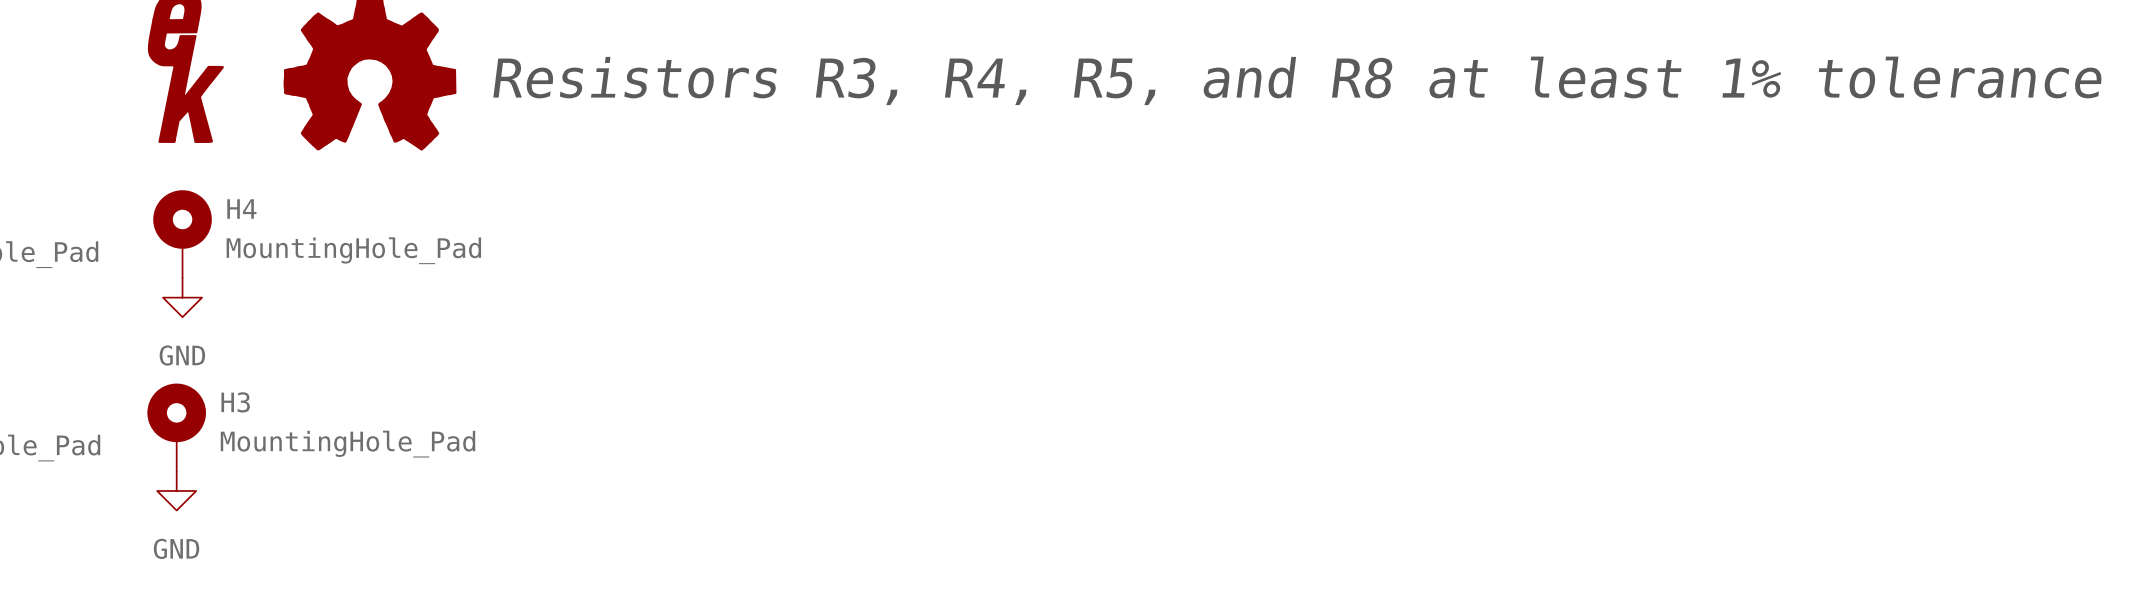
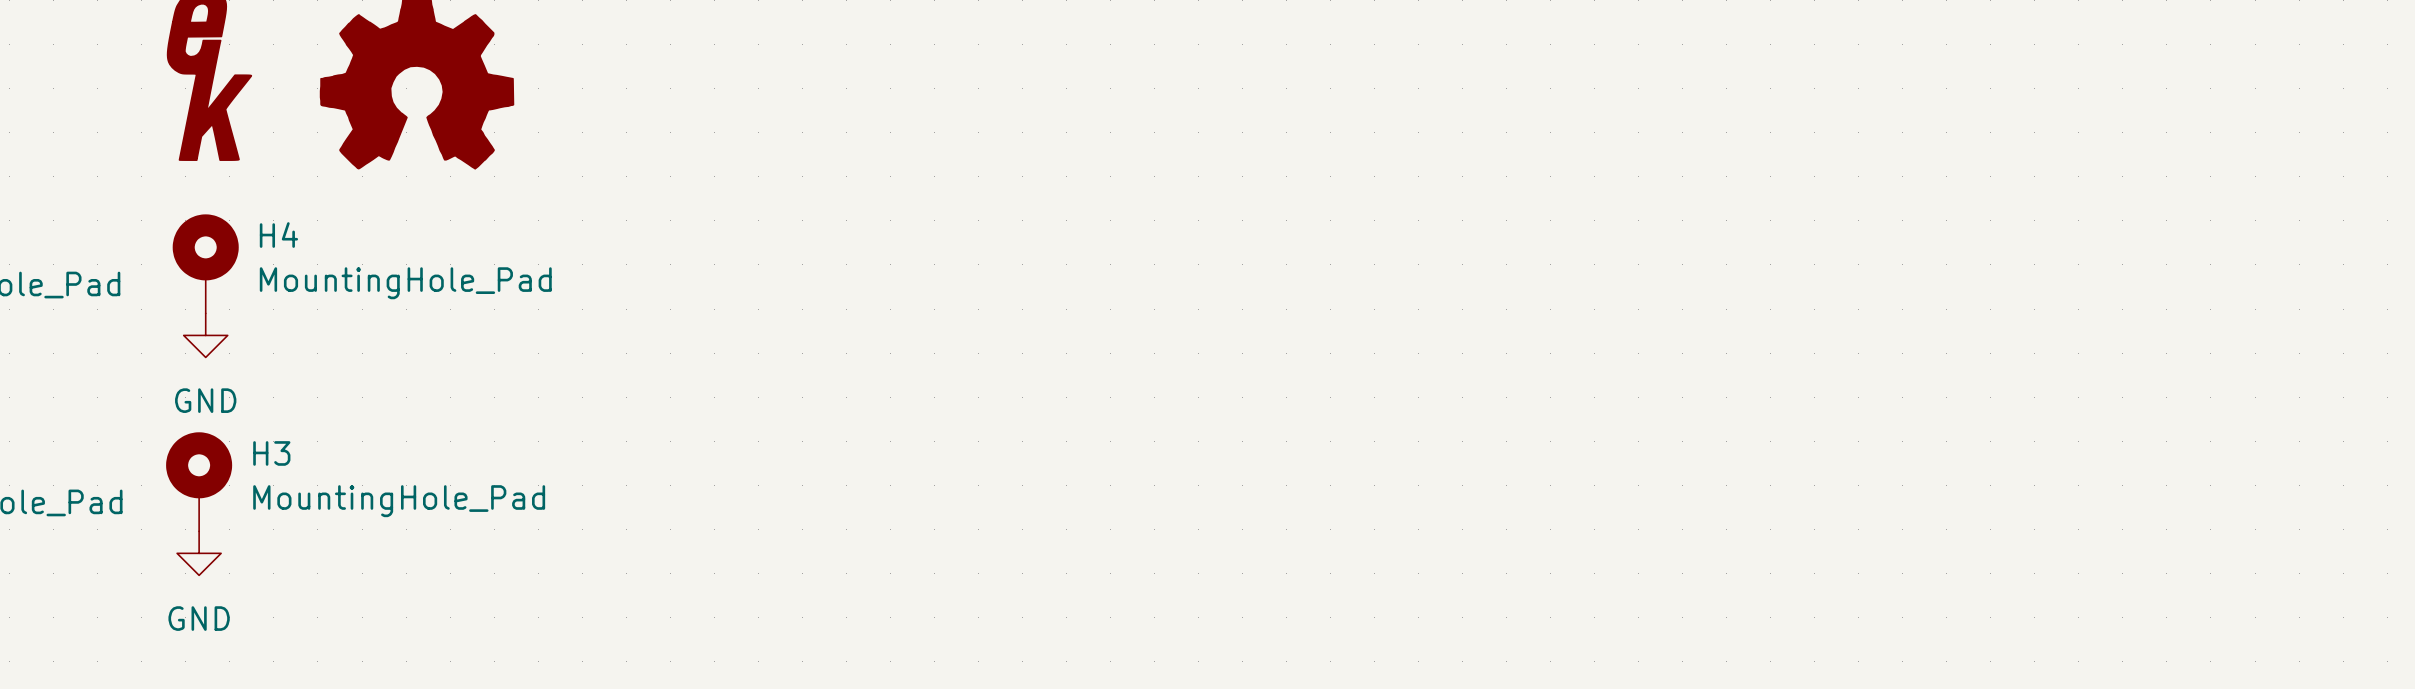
text: Resistors R3, R4, R5, and R8 at least 1% tolerance (1297, 80) -> none

